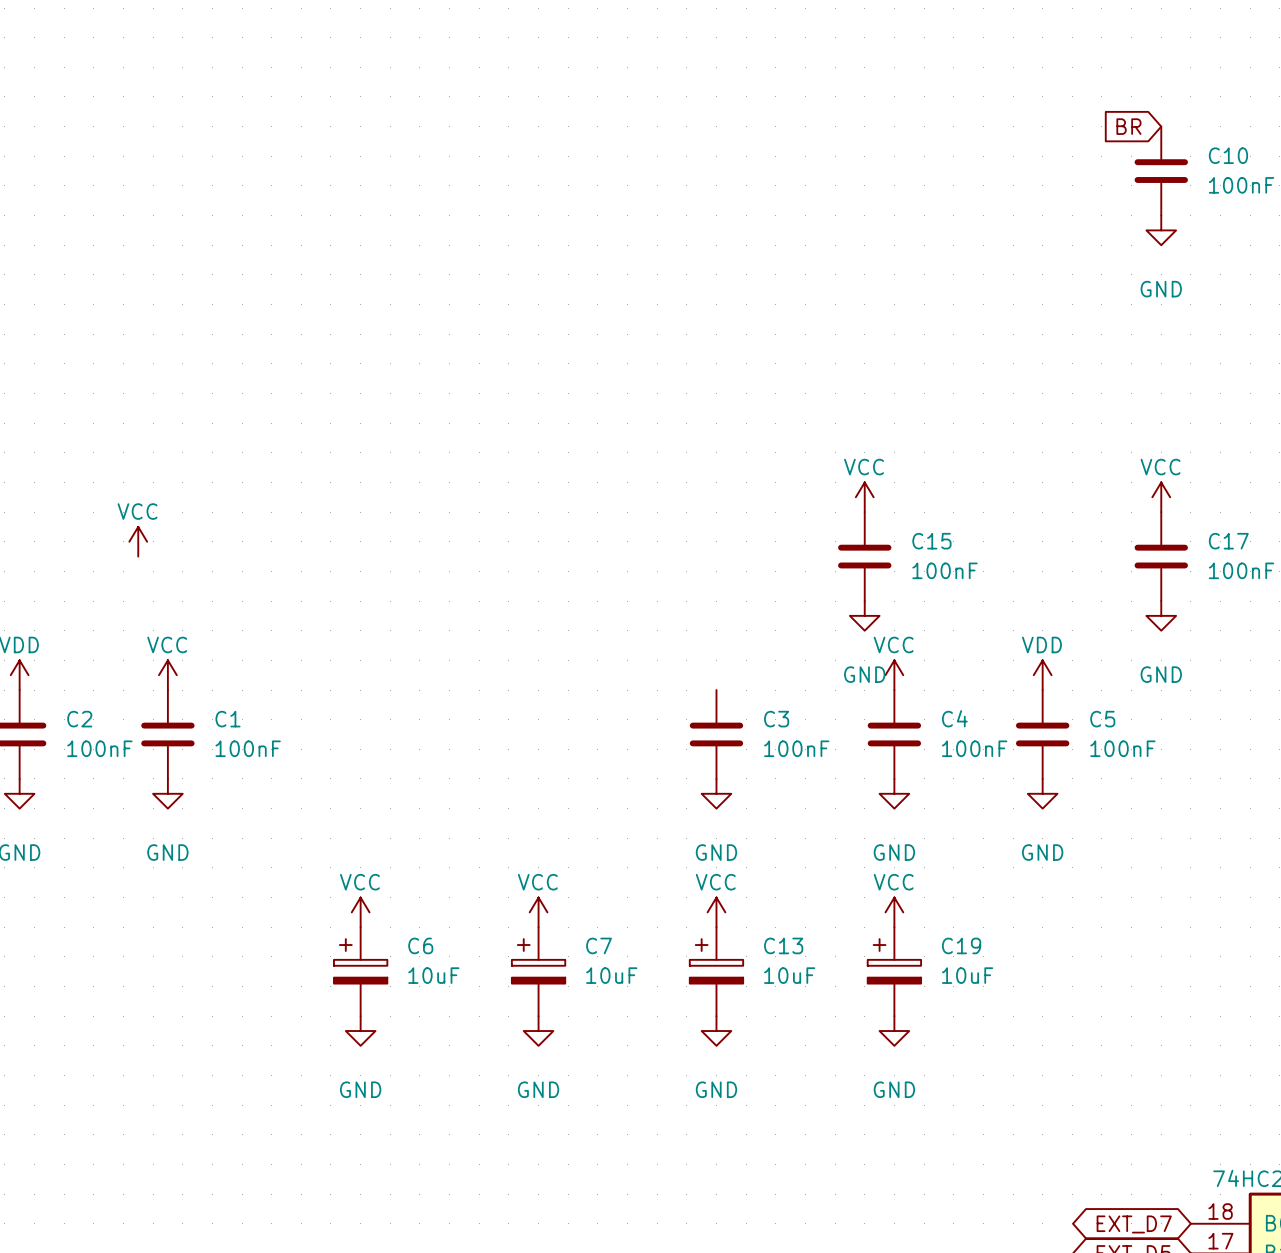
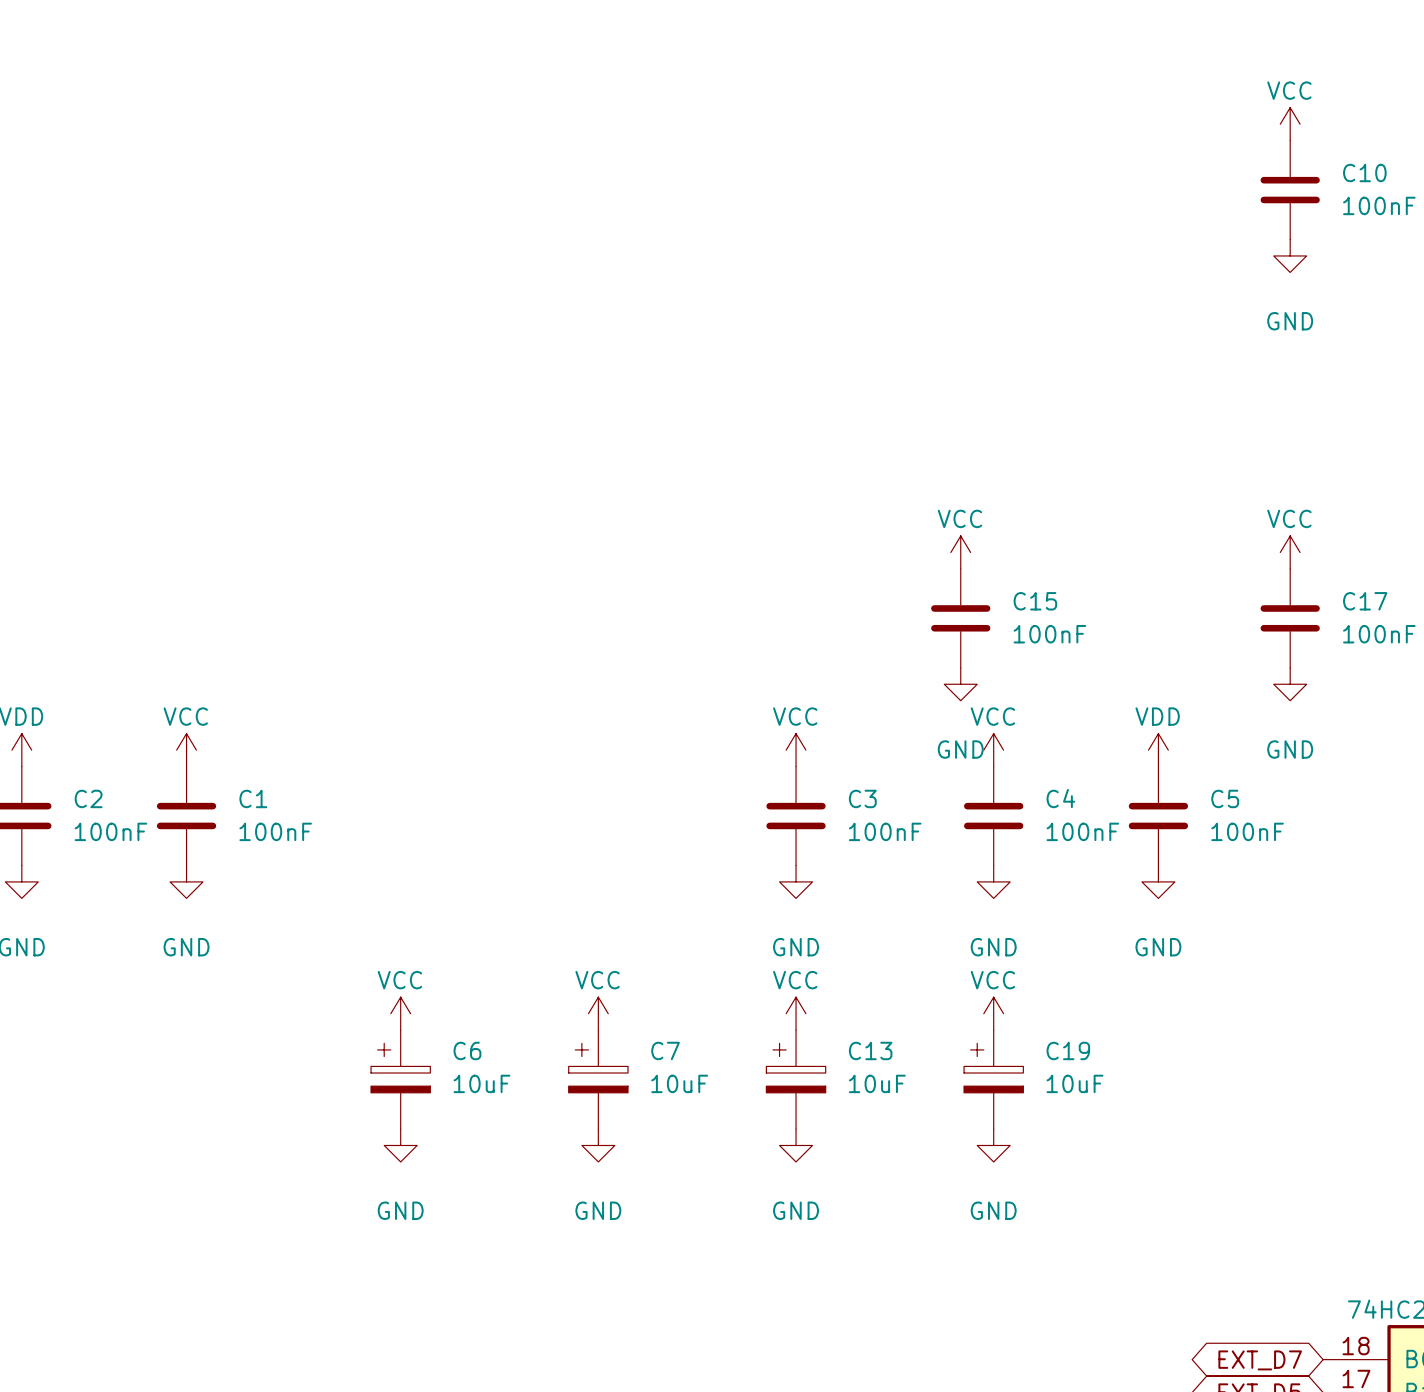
power symbol: none -> VCC (1290, 124)
global label: BR (1128, 126) -> none
power symbol: VCC (138, 541) -> none
power symbol: none -> VCC (796, 750)

